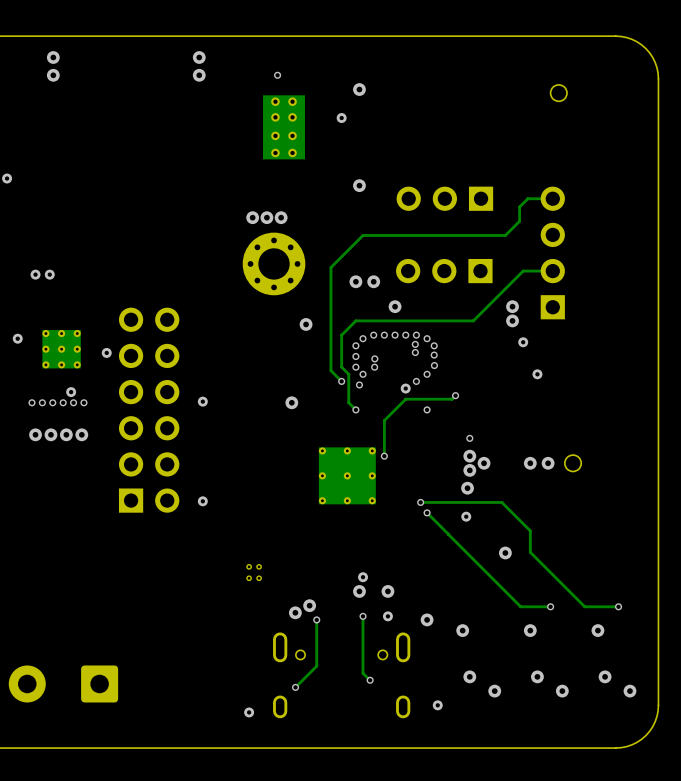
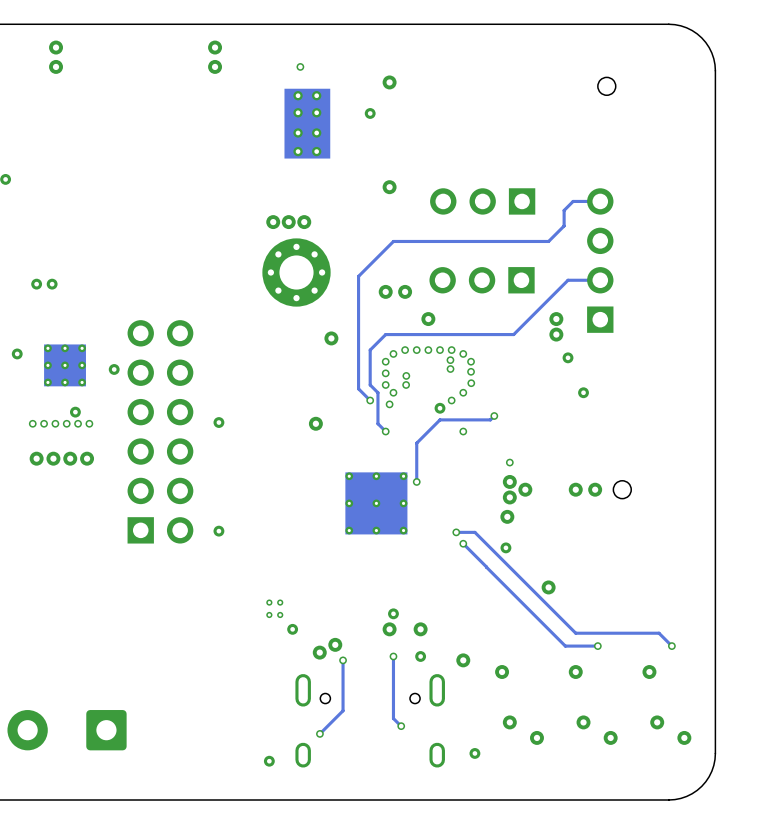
track: (437, 502) (501, 502) (530, 530) (530, 552) (584, 606) (618, 606) -> (474, 532) (575, 633) (659, 633) (671, 646)
via: none -> (292, 629)

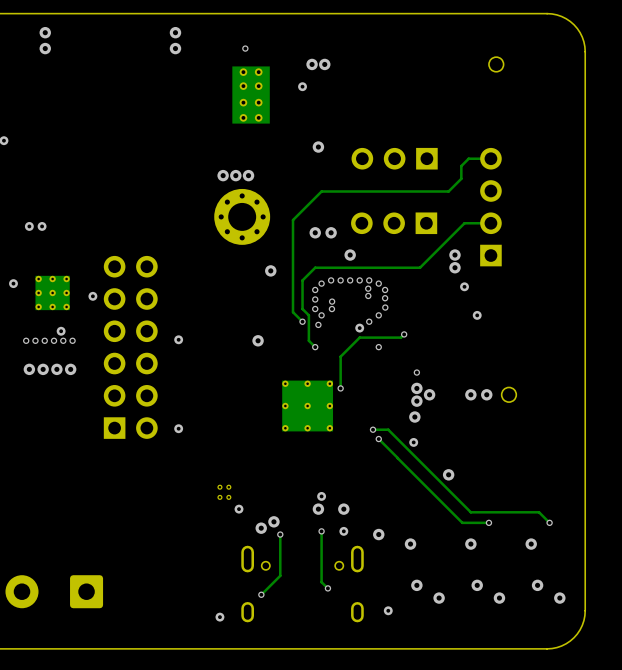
via: (389, 82) -> none
via: none -> (312, 64)
via: none -> (324, 64)

